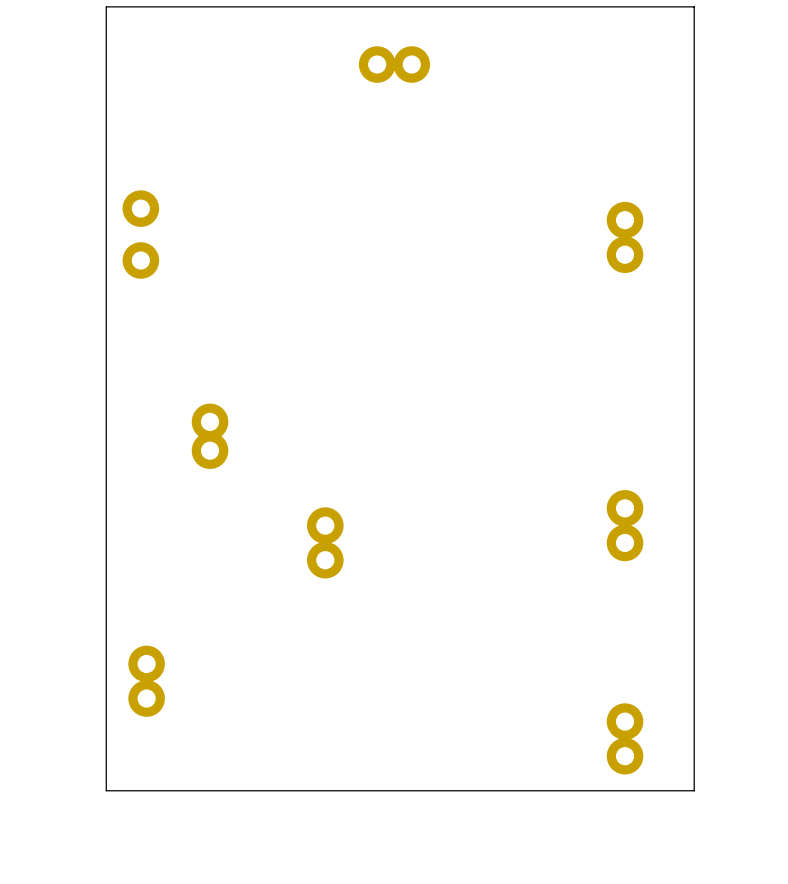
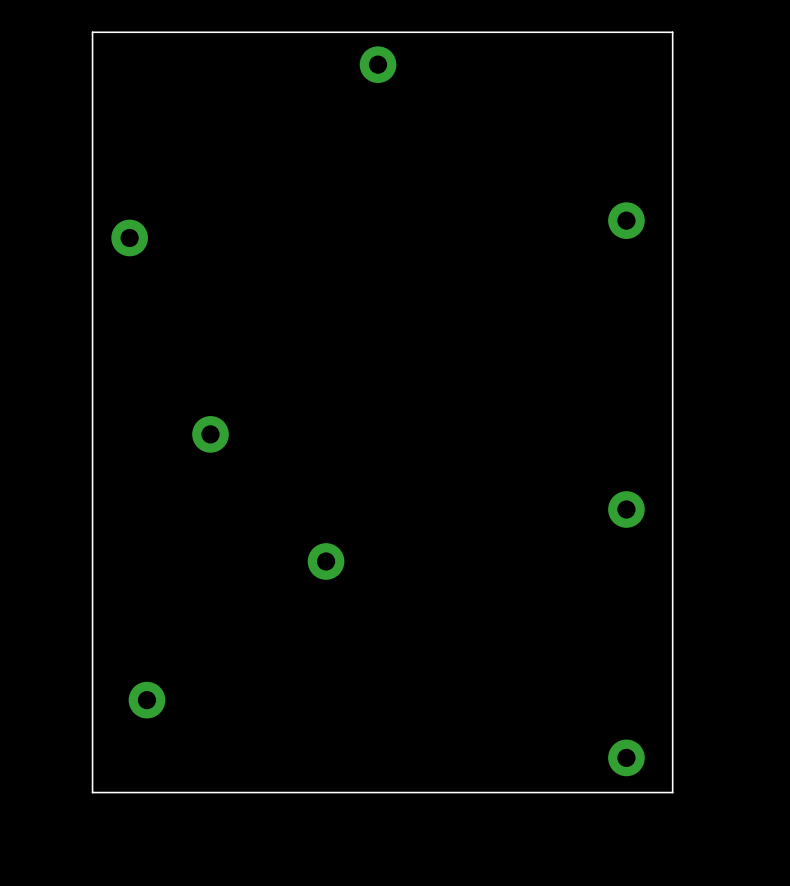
part: (411, 64) -> none
part: (140, 208) -> none
part: none -> (129, 237)
part: (625, 254) -> none
part: (140, 260) -> none
part: (210, 421) -> none
part: none -> (210, 434)
part: (210, 450) -> none
part: (325, 525) -> none
part: (625, 542) -> none
part: (146, 663) -> none
part: (625, 721) -> none
board edge: (671, 790) (694, 790) (694, 6) (106, 6) (106, 790) -> (672, 792) (672, 32) (92, 32) (92, 792) (106, 792)

